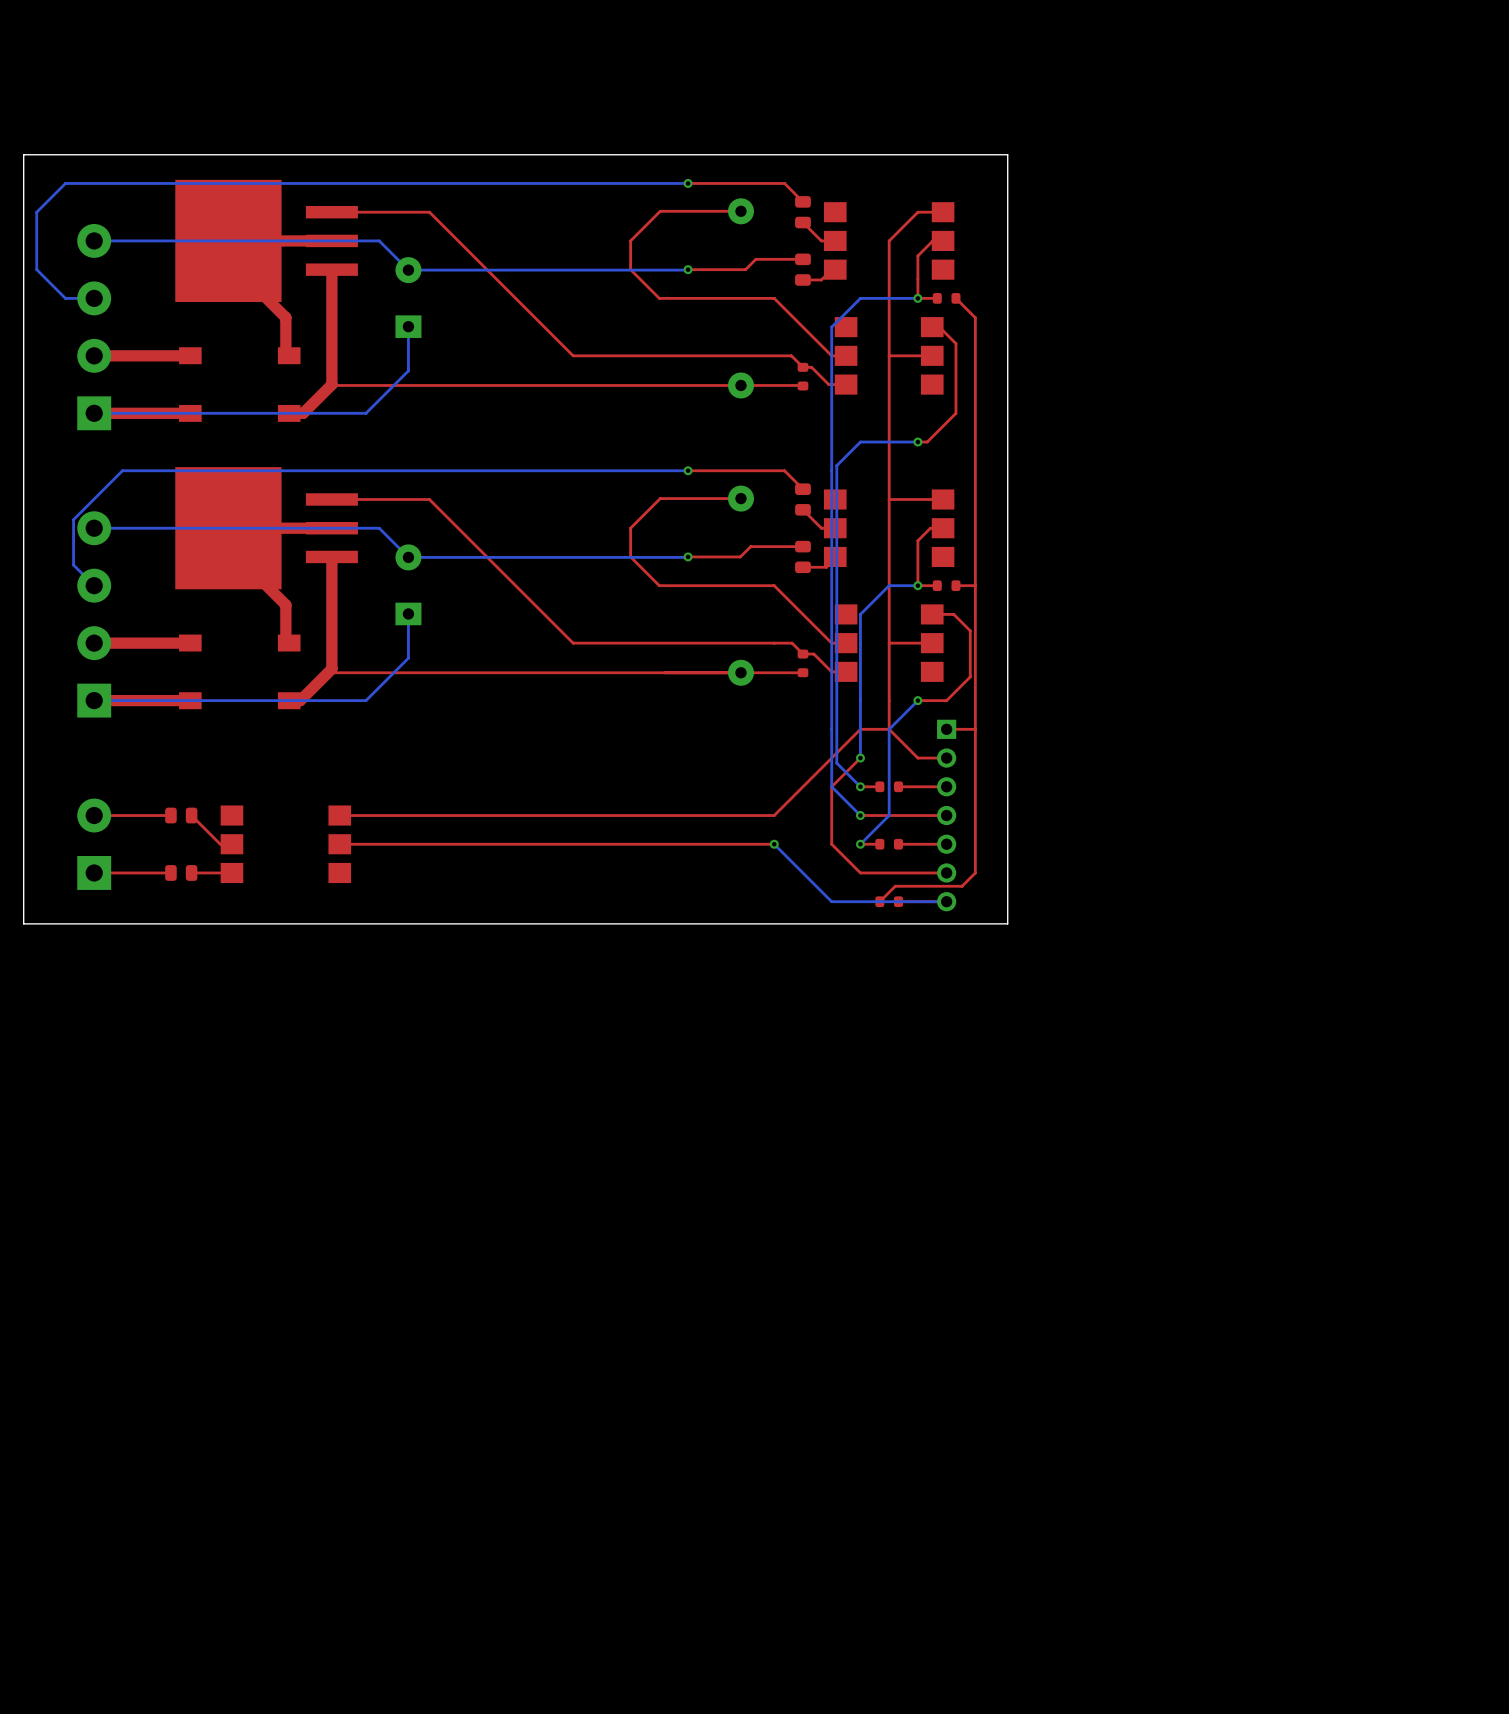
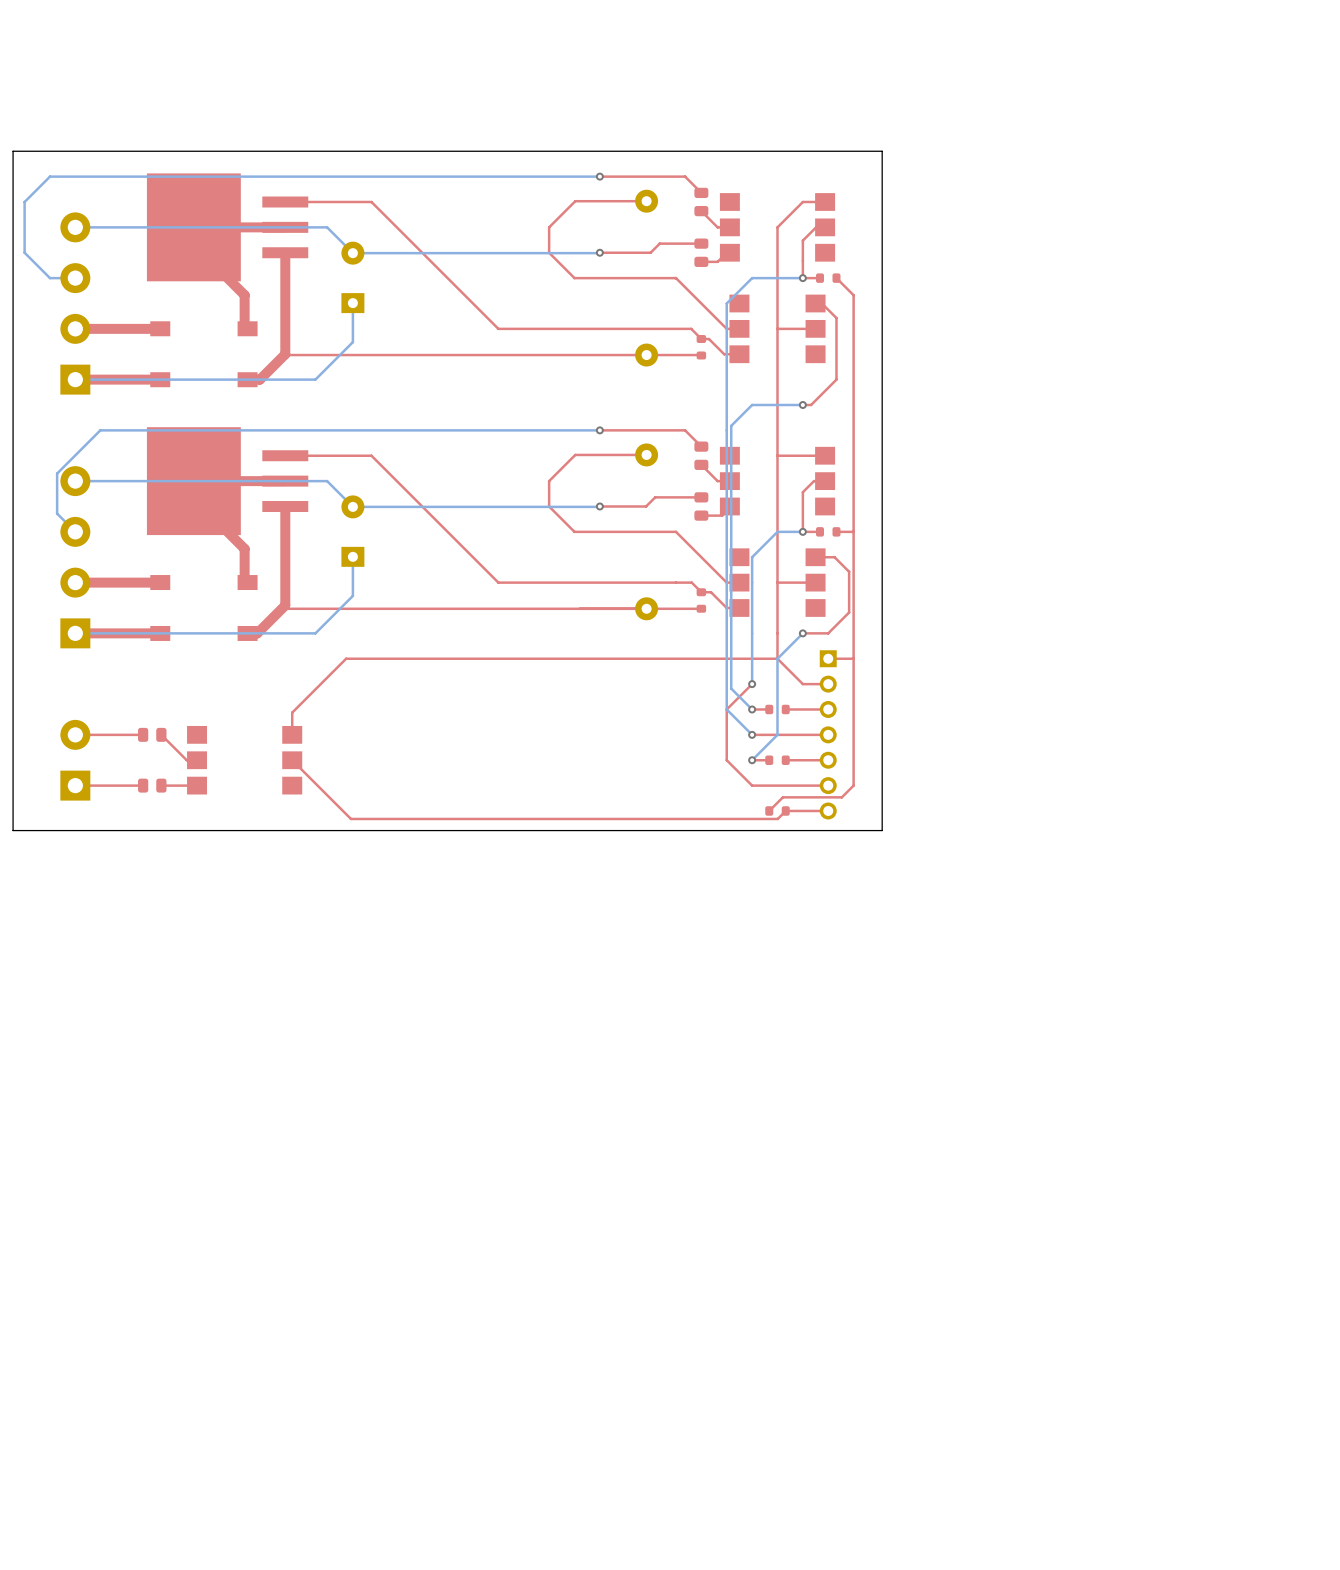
top track: (860, 729) (774, 815) (339, 815) -> (752, 658) (346, 658) (292, 712) (292, 734)
top track: (774, 844) (339, 844) -> (785, 810) (777, 818) (350, 818) (292, 760)
bottom track: (774, 844) (831, 901) (946, 901) -> none
via: (774, 844) -> none

